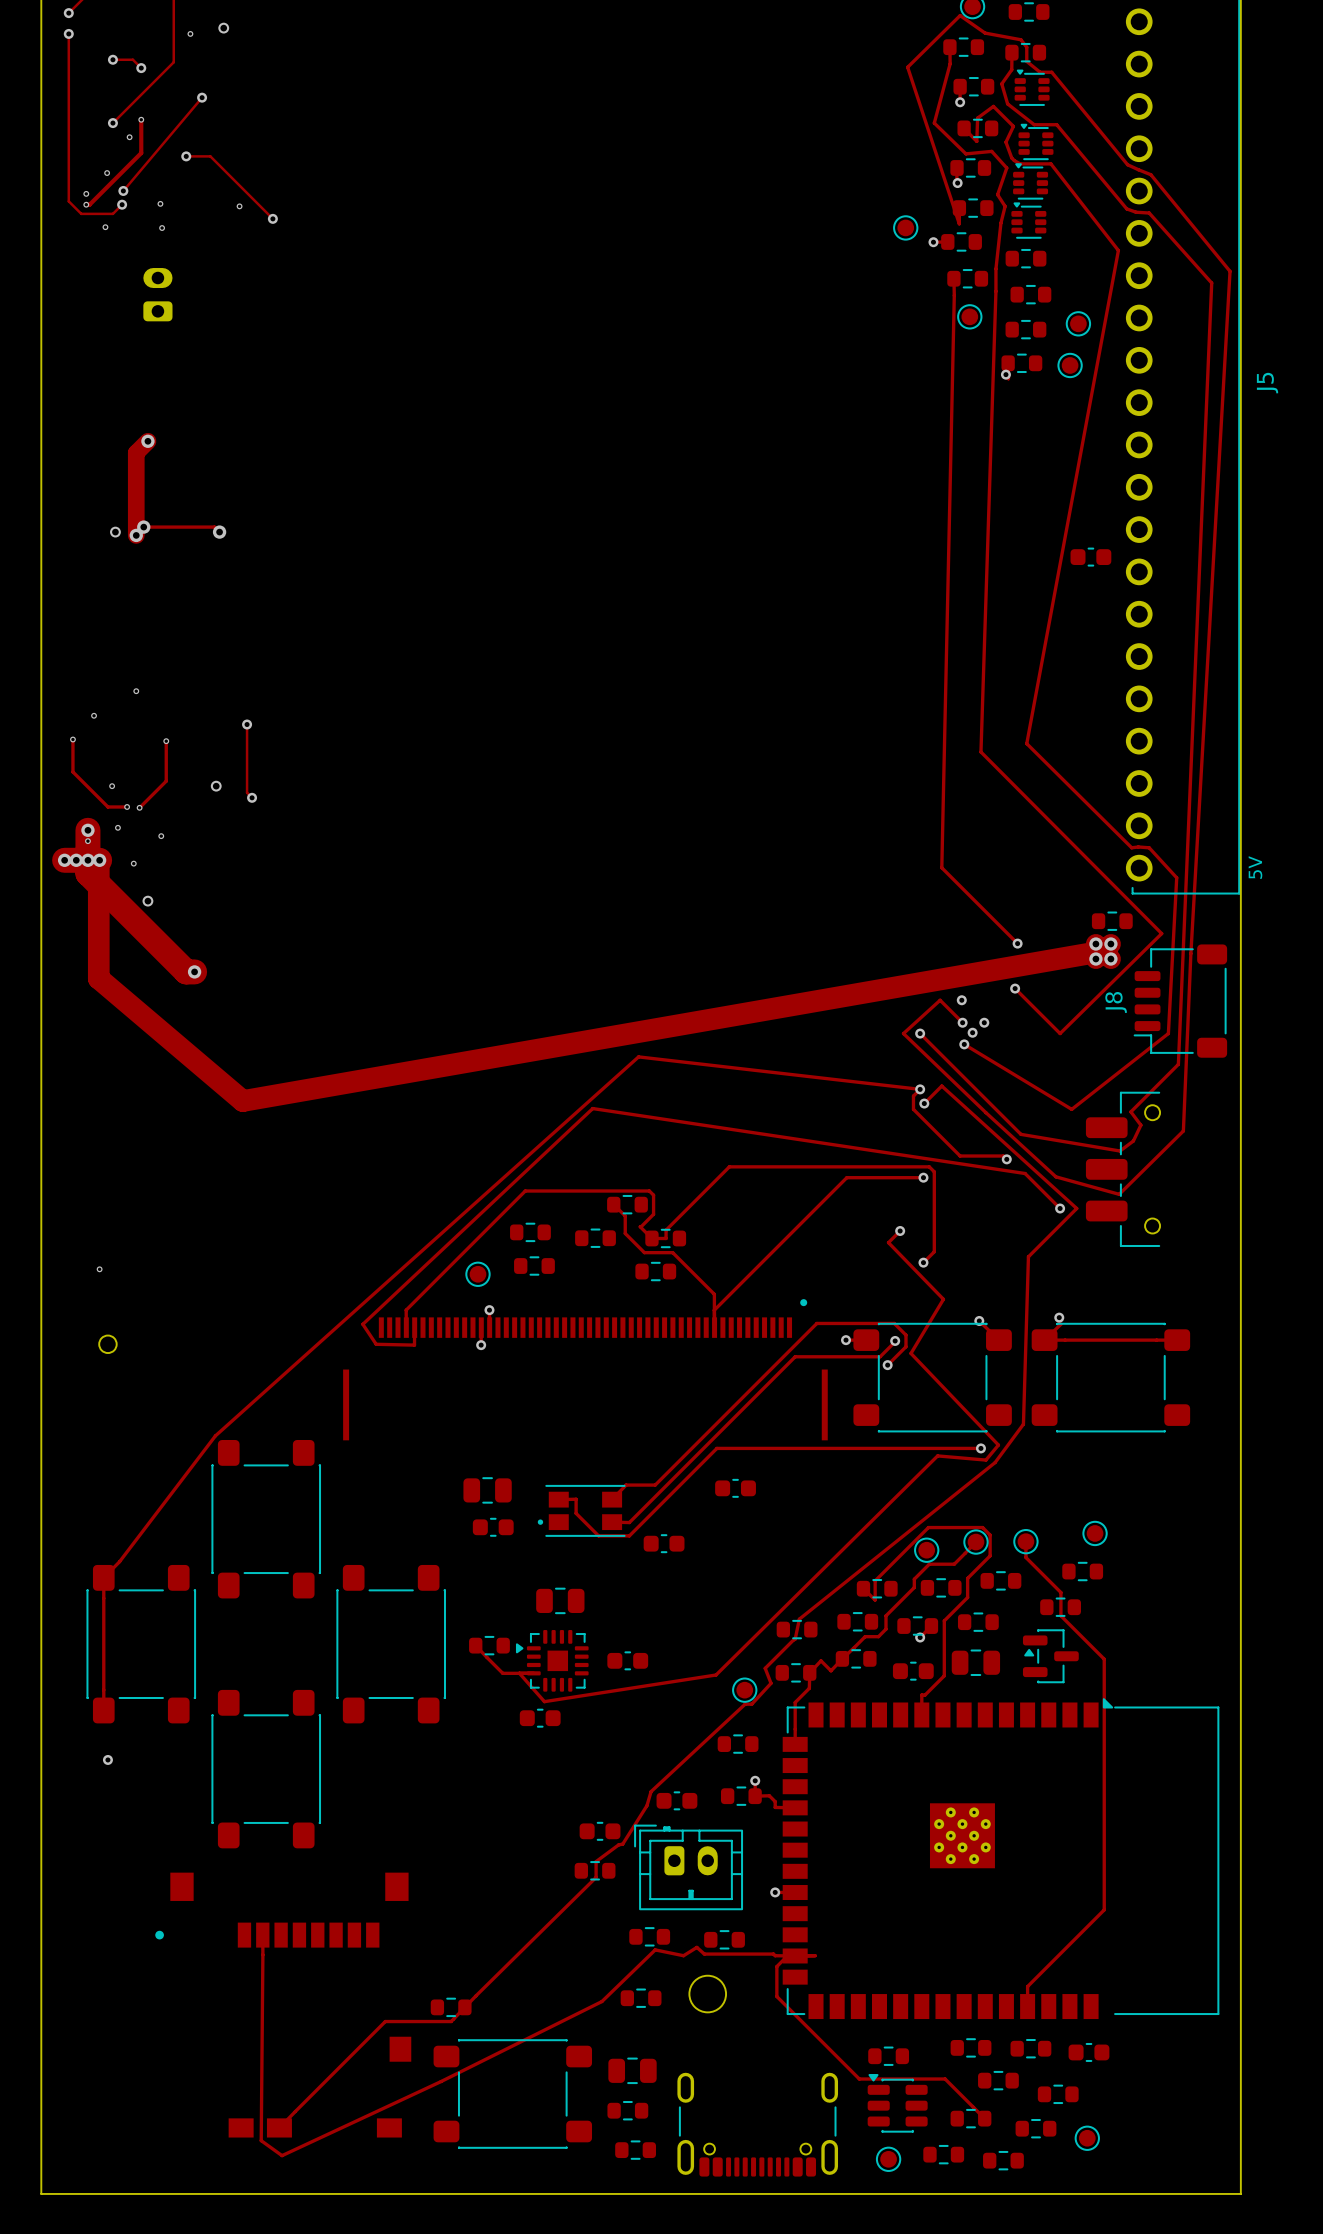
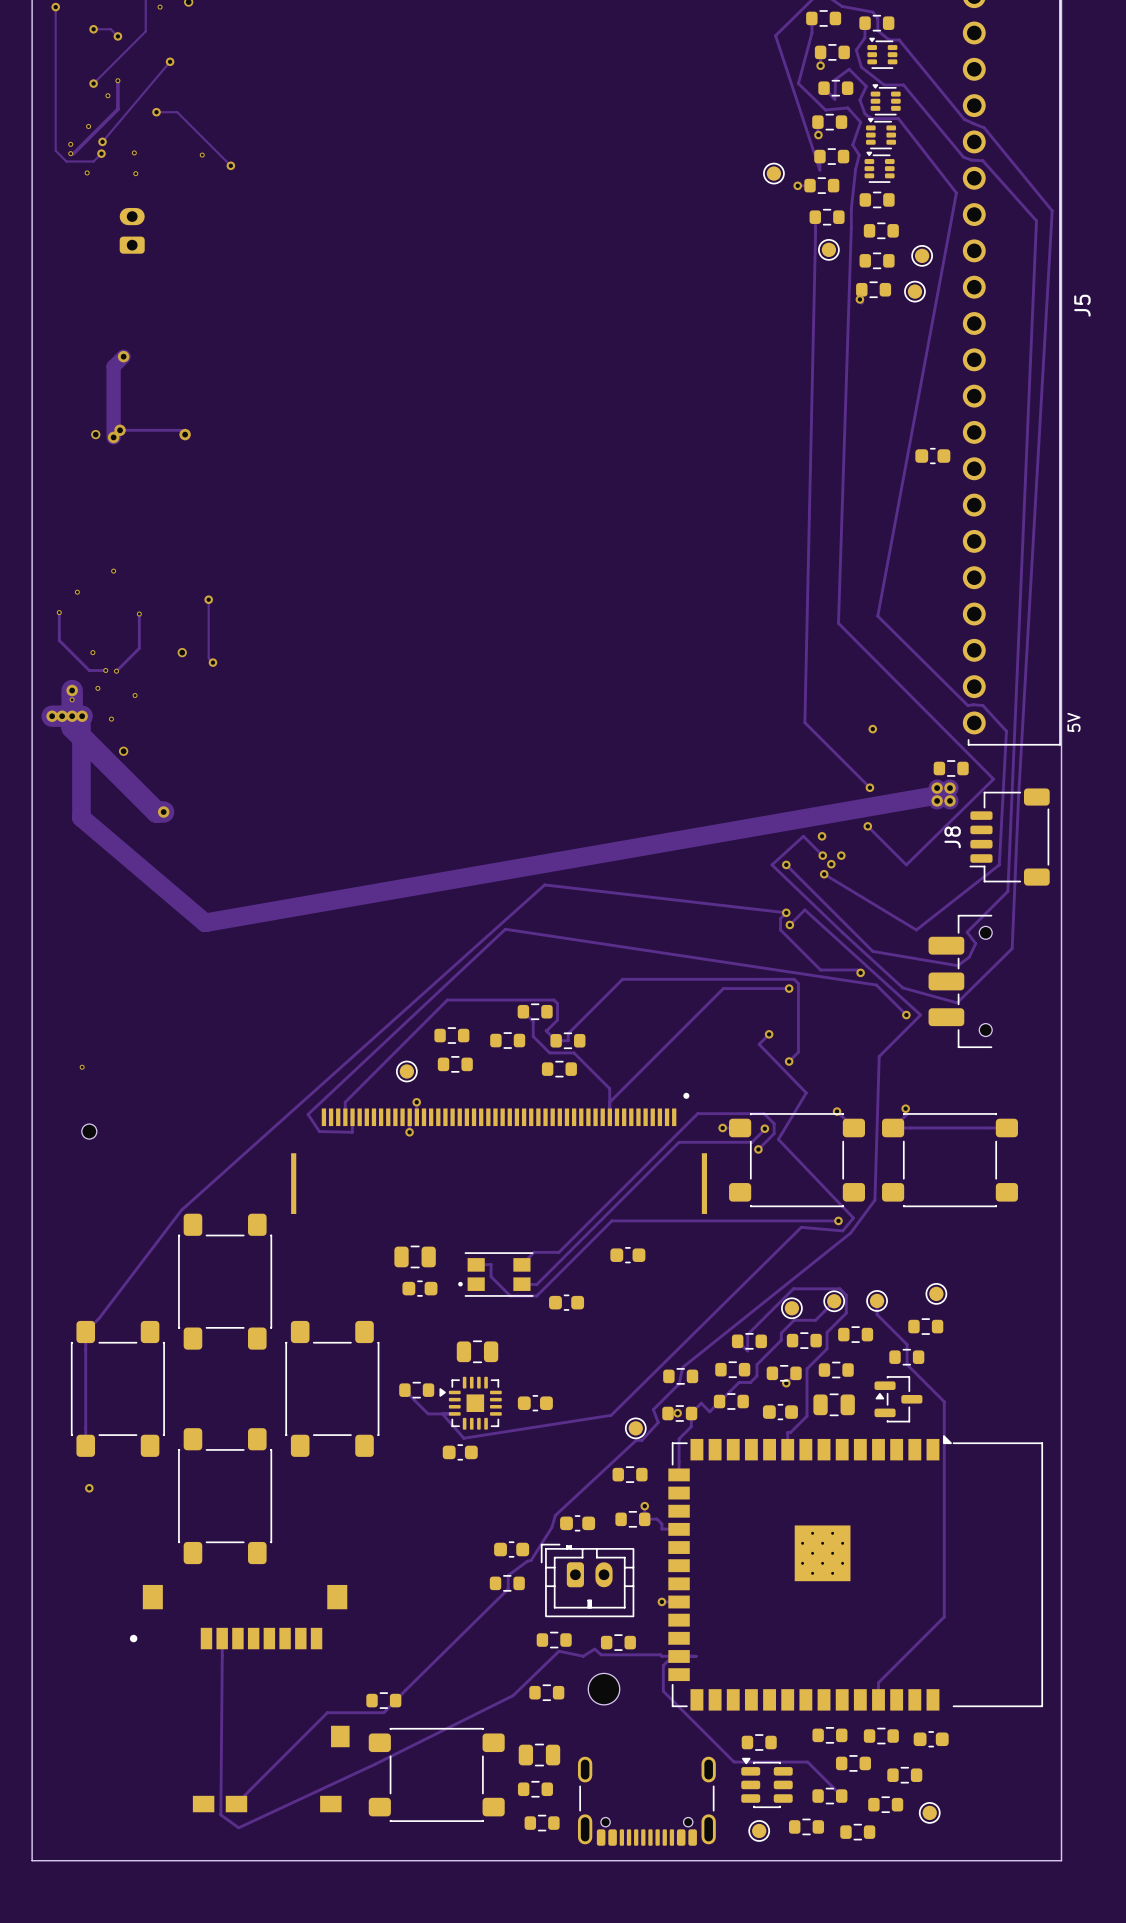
via: none -> (872, 729)
via: none -> (677, 1413)

